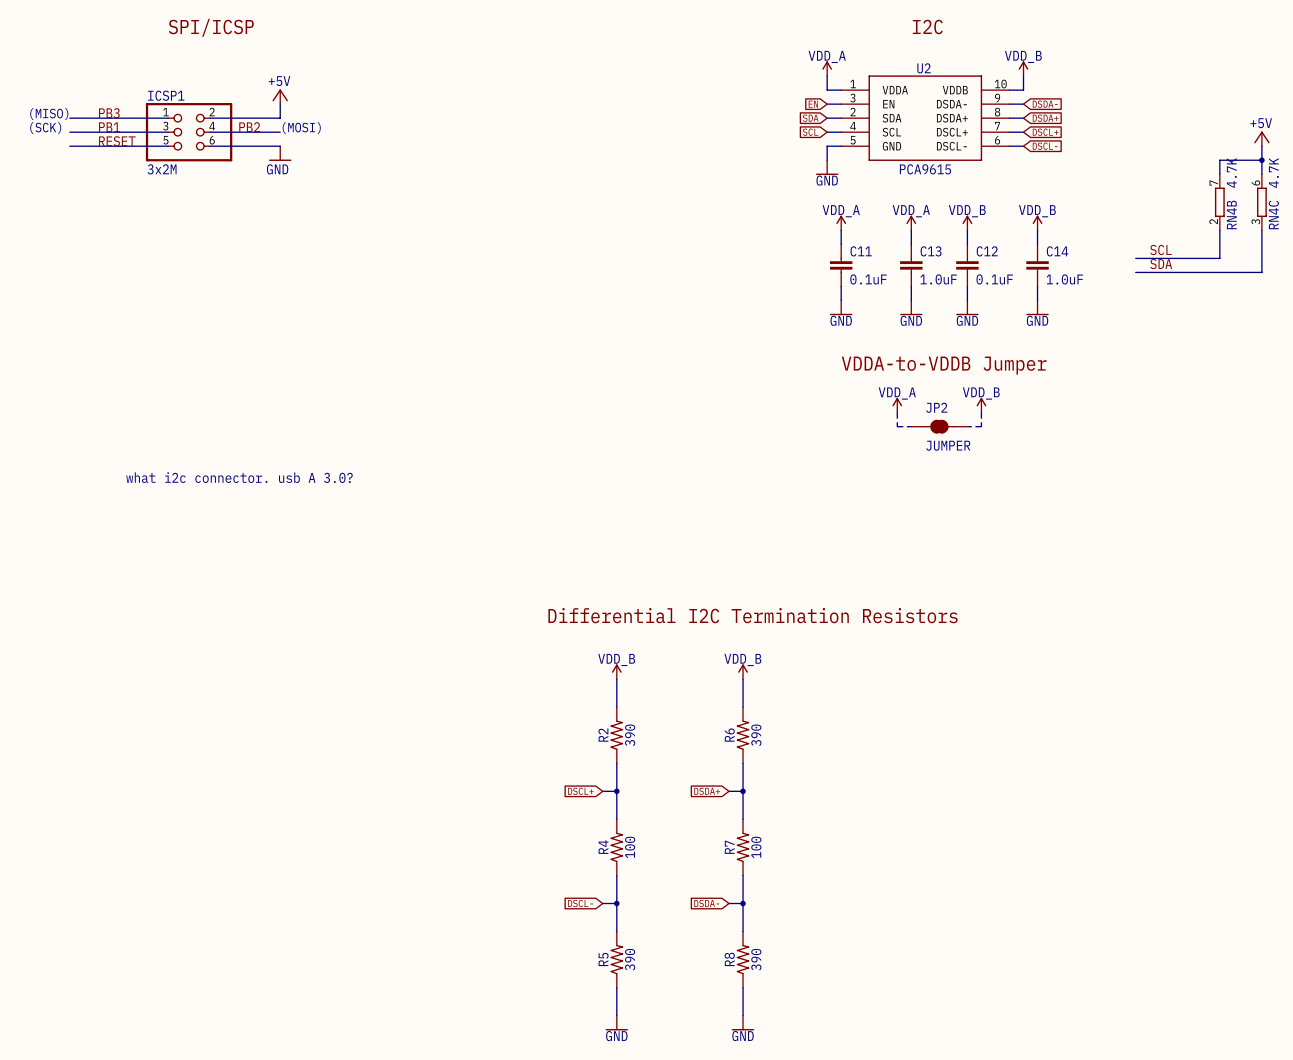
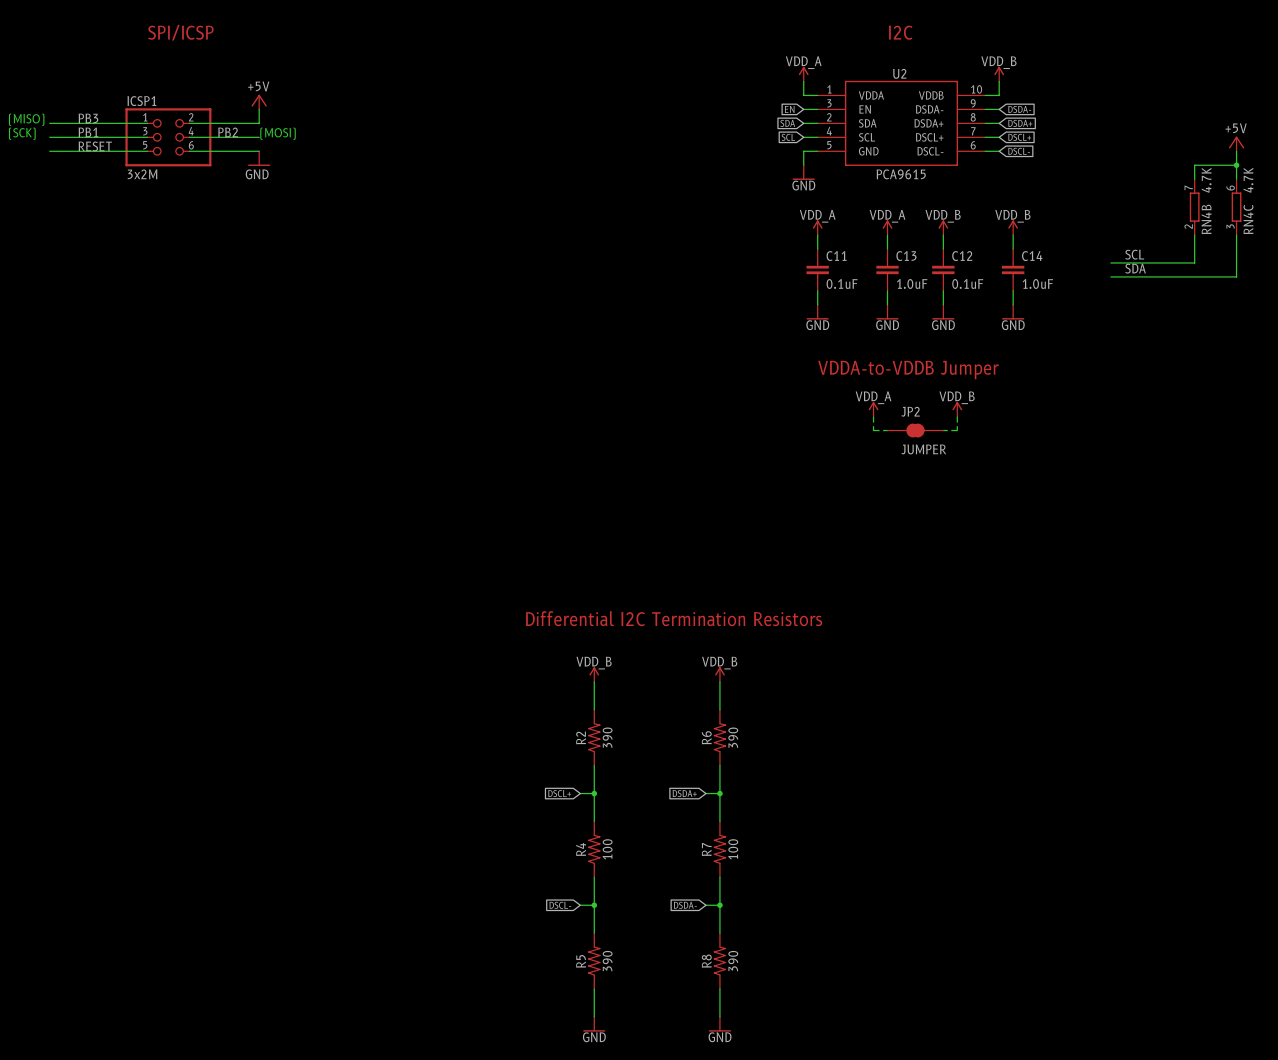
text: what i2c connector. usb A 3.0? (239, 477) -> none

